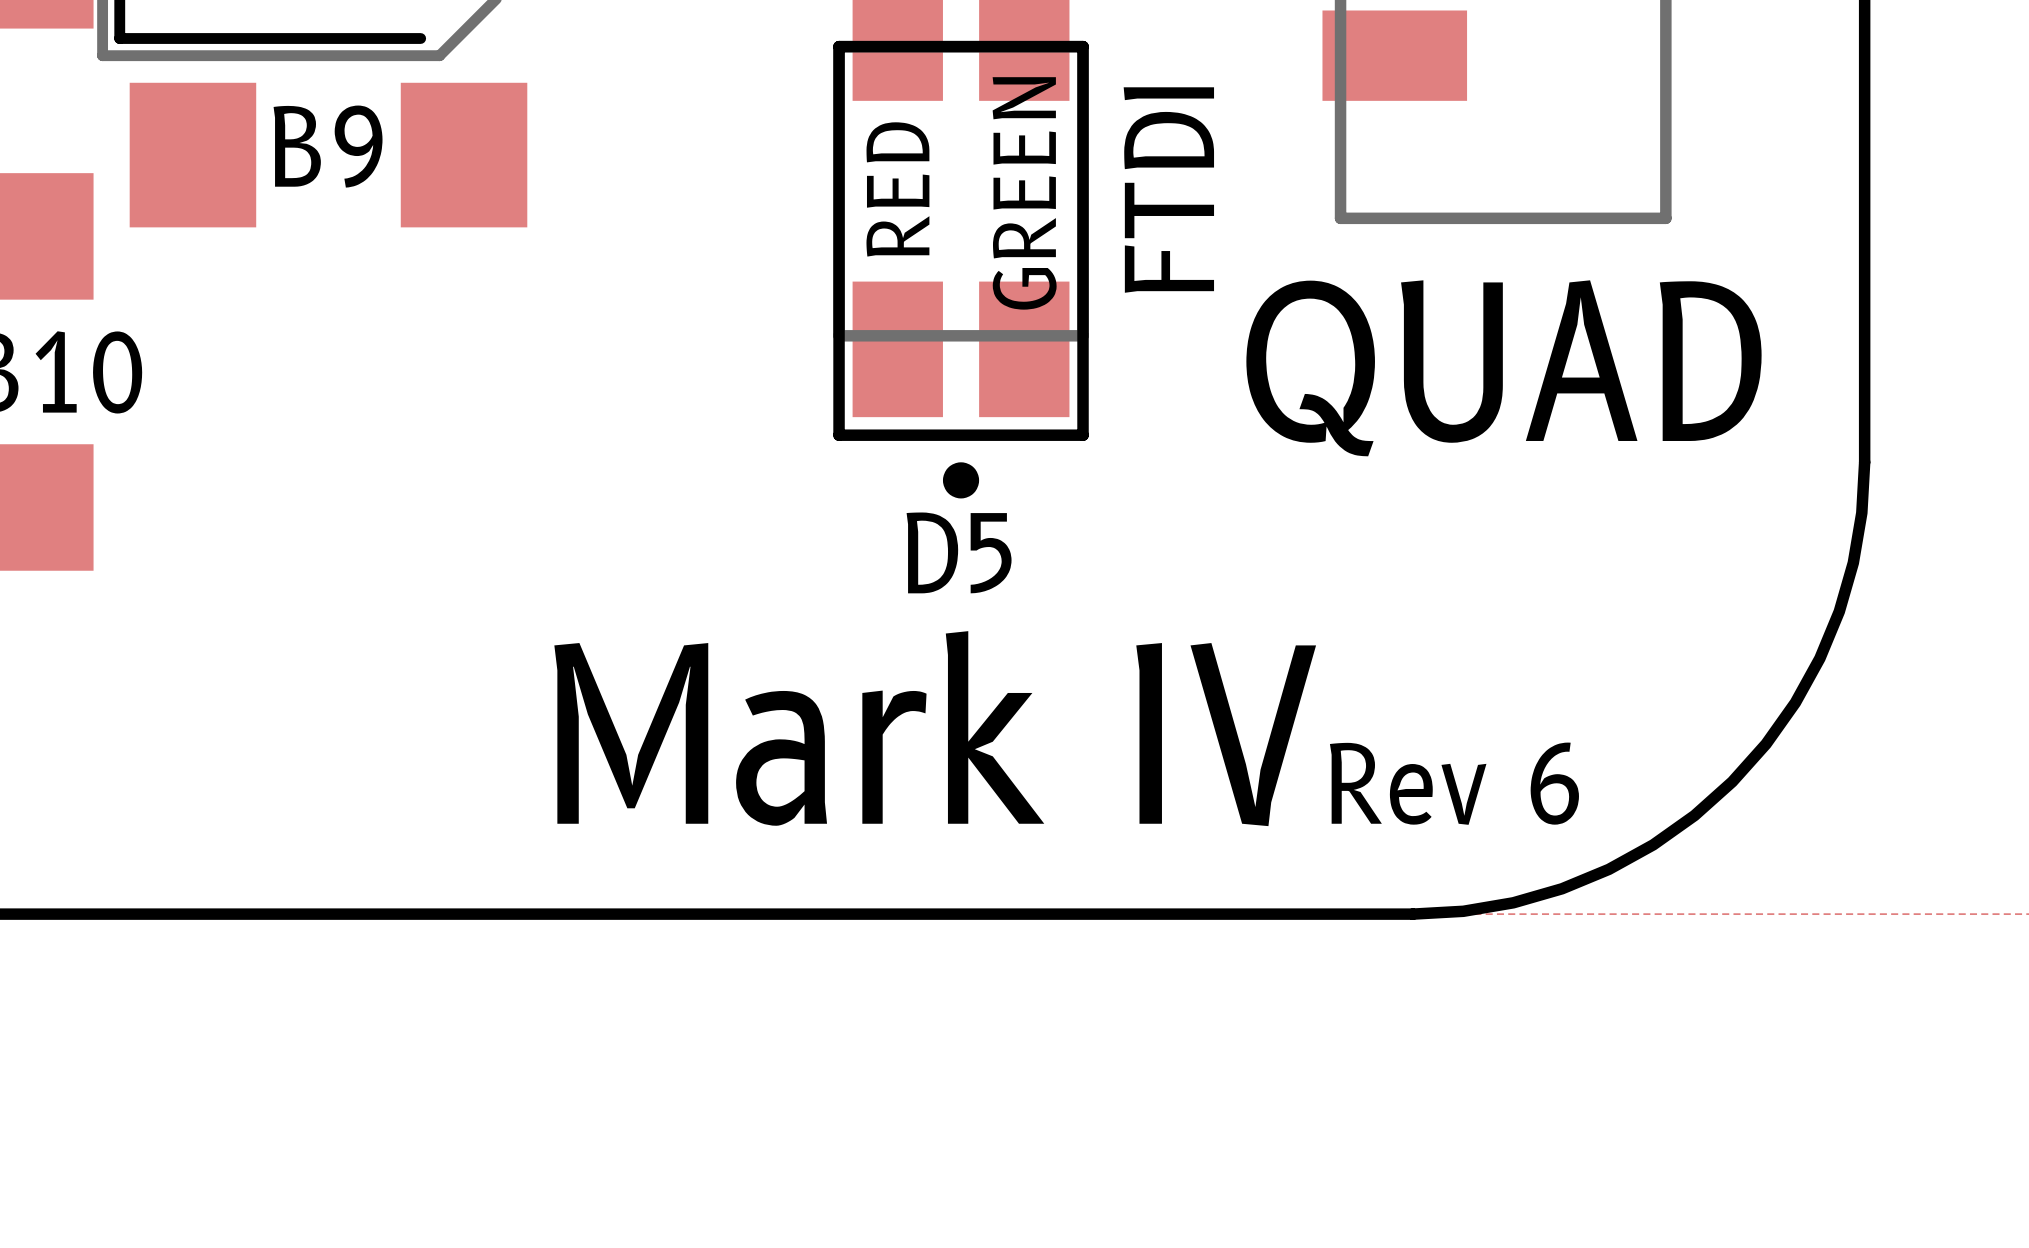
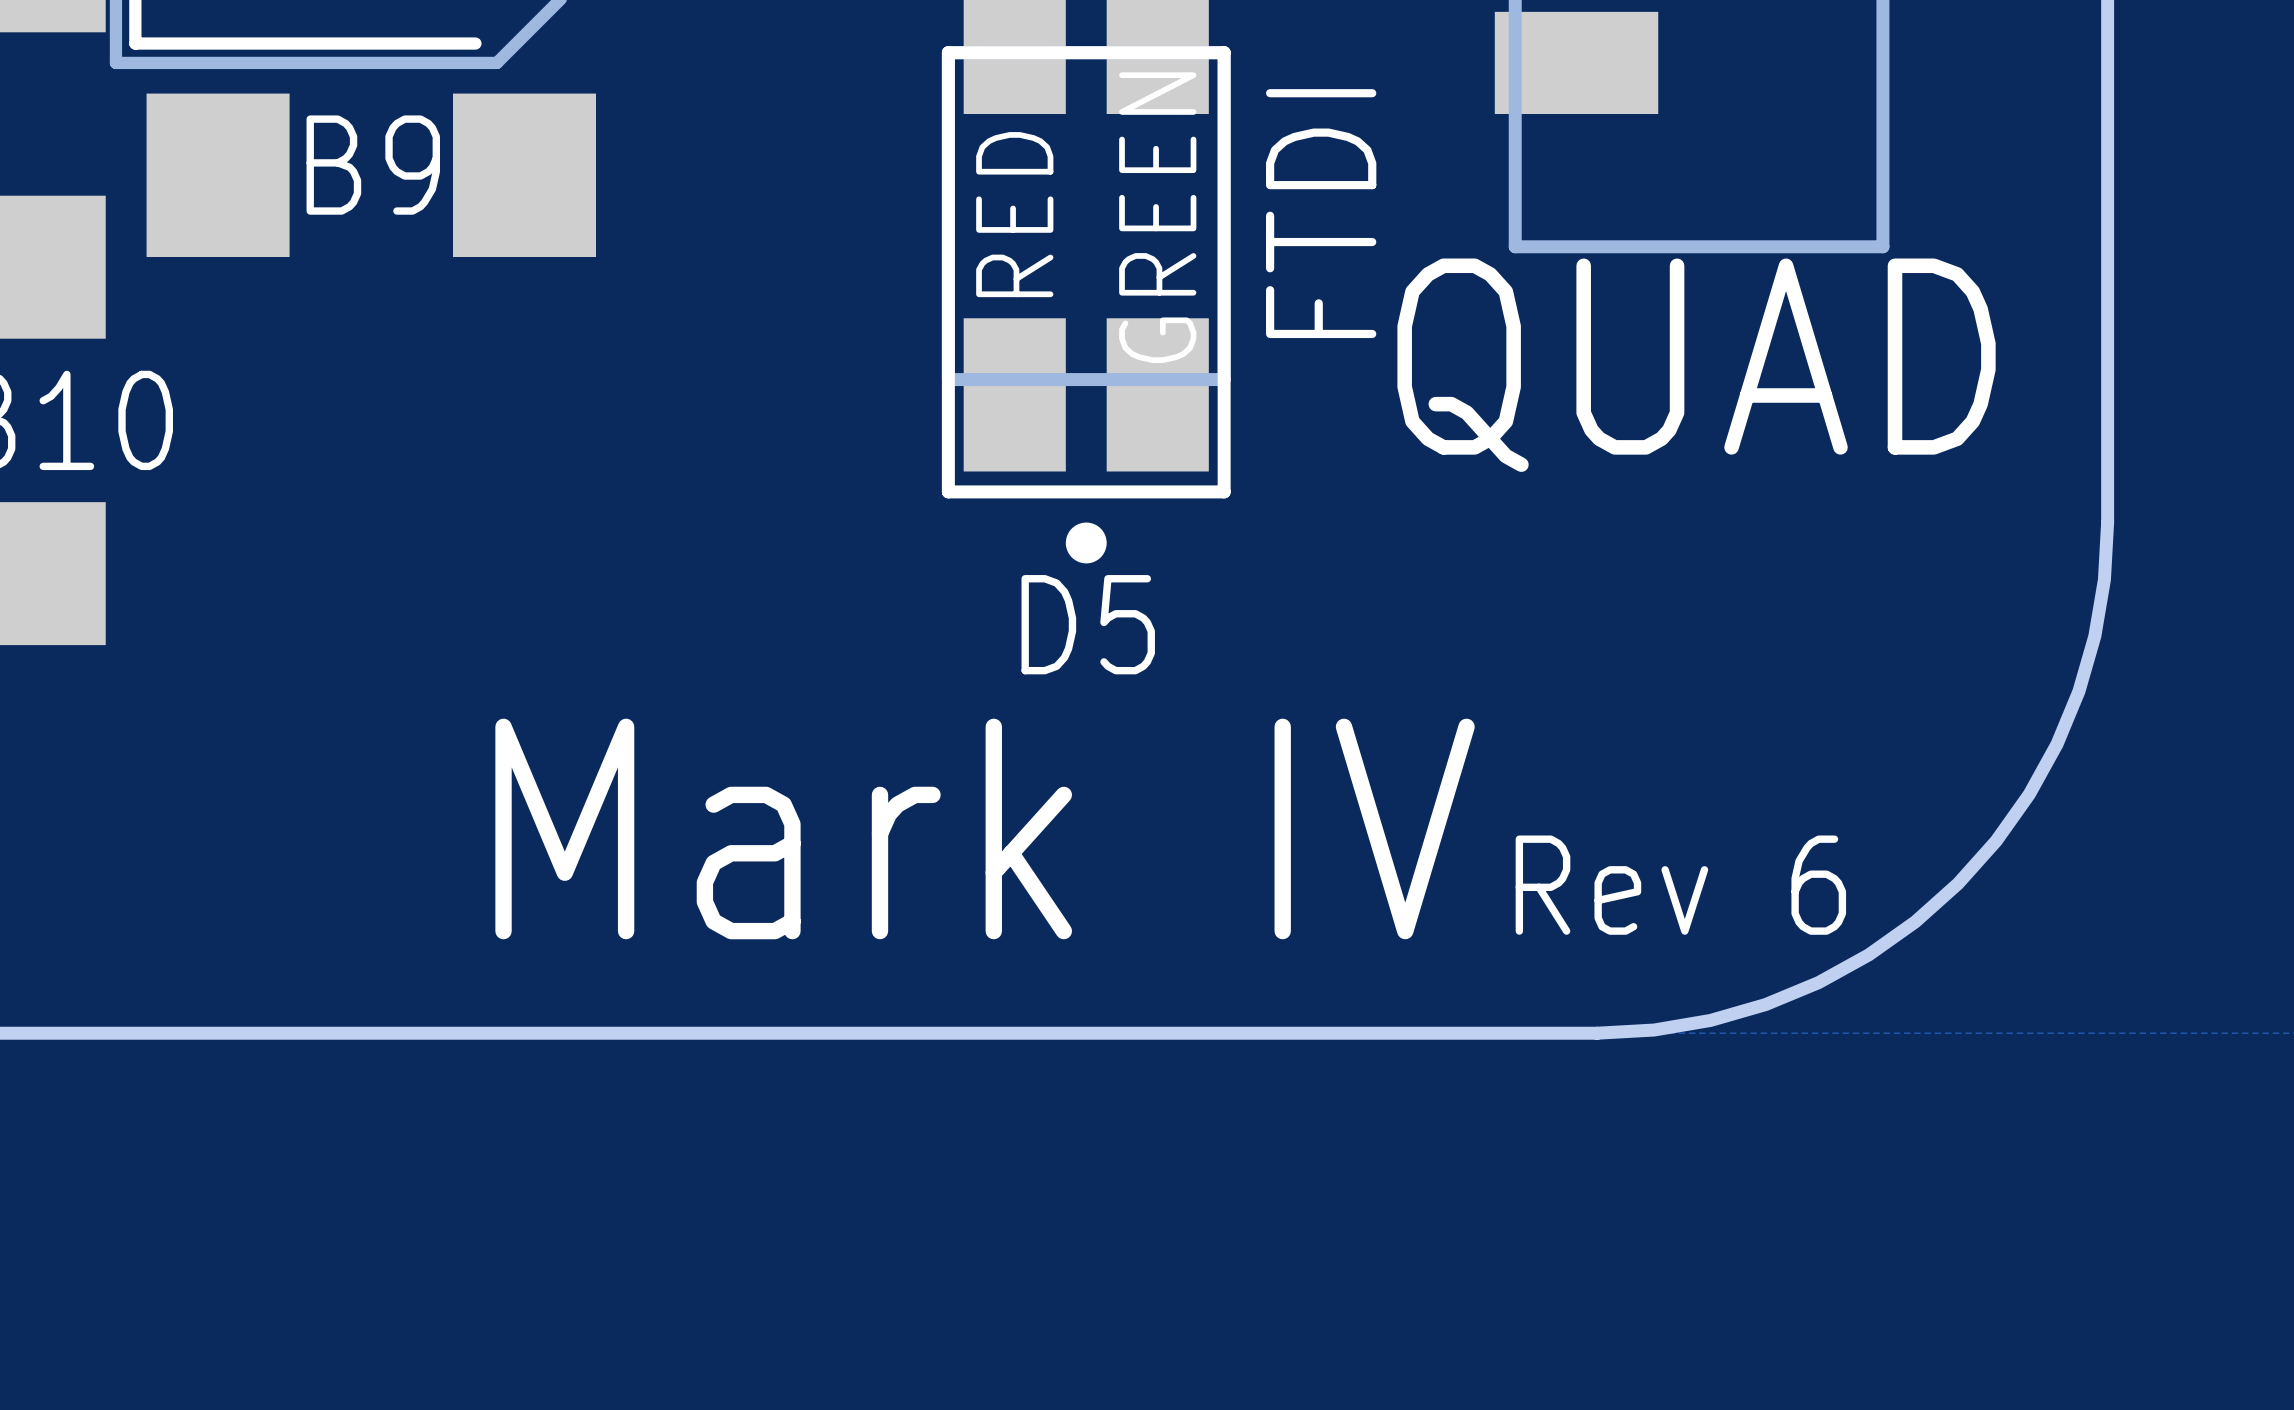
text position: QUAD (1503, 368) -> QUAD (1696, 365)

